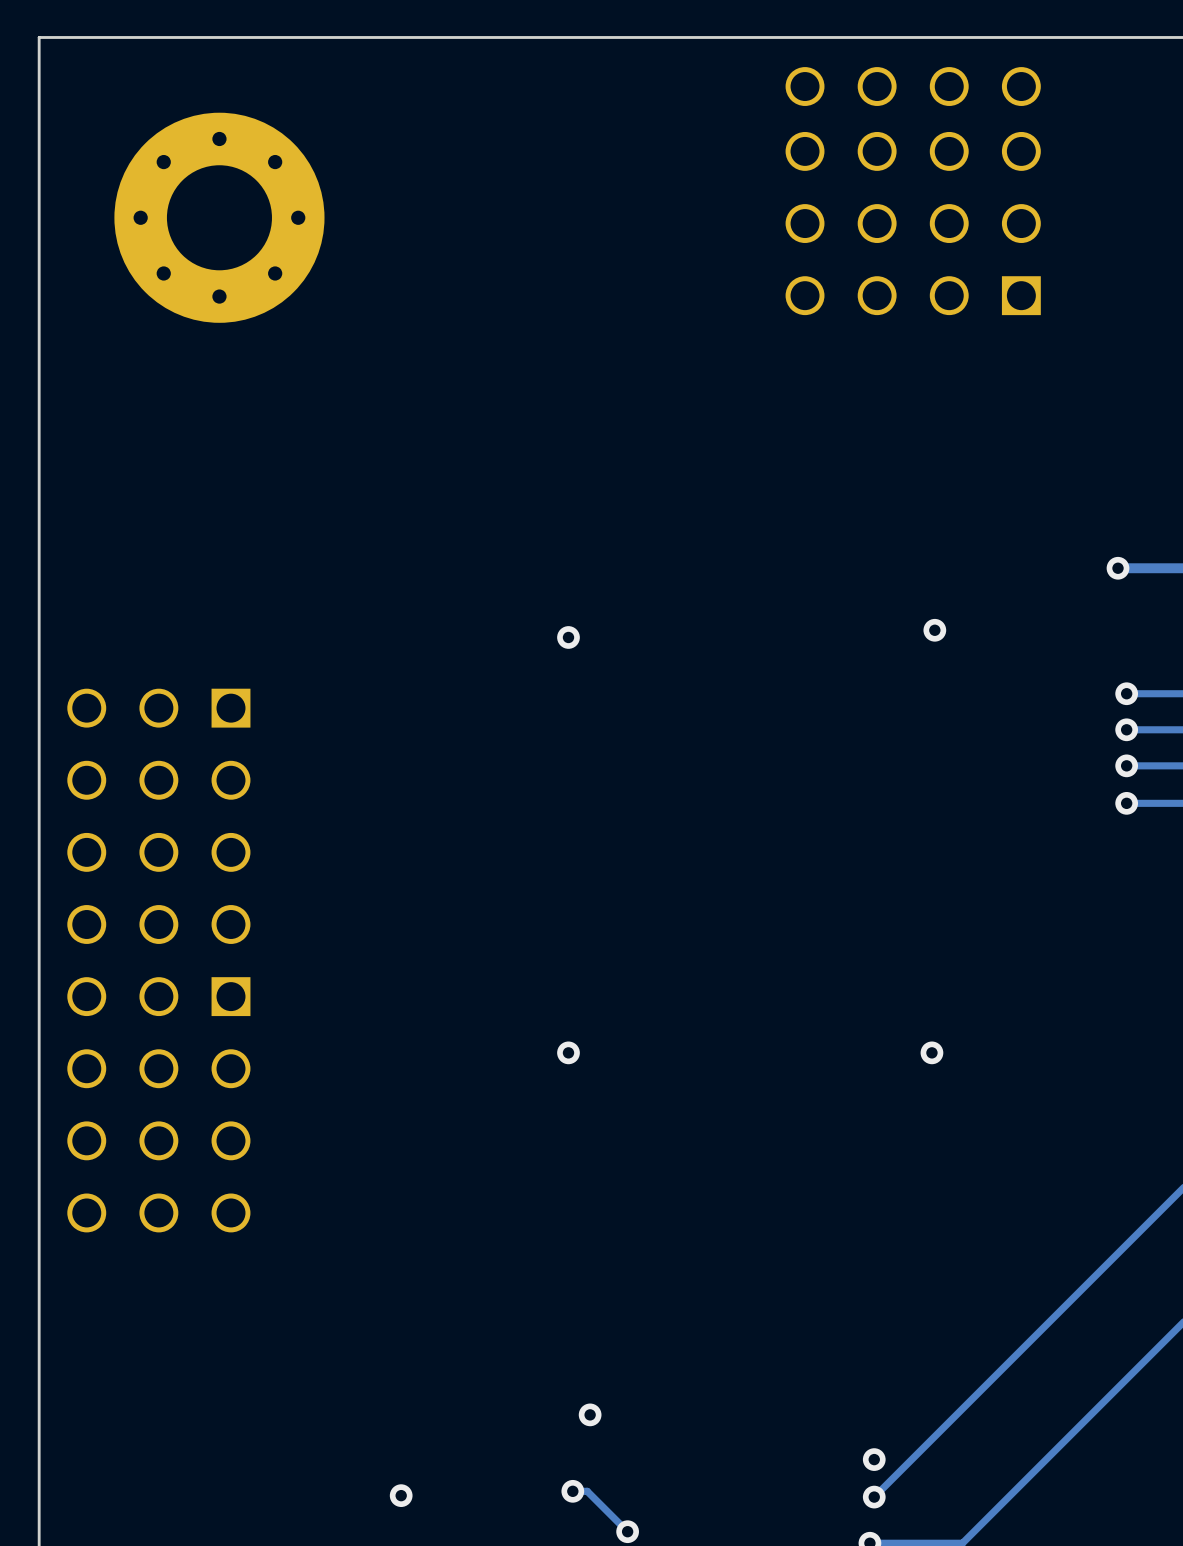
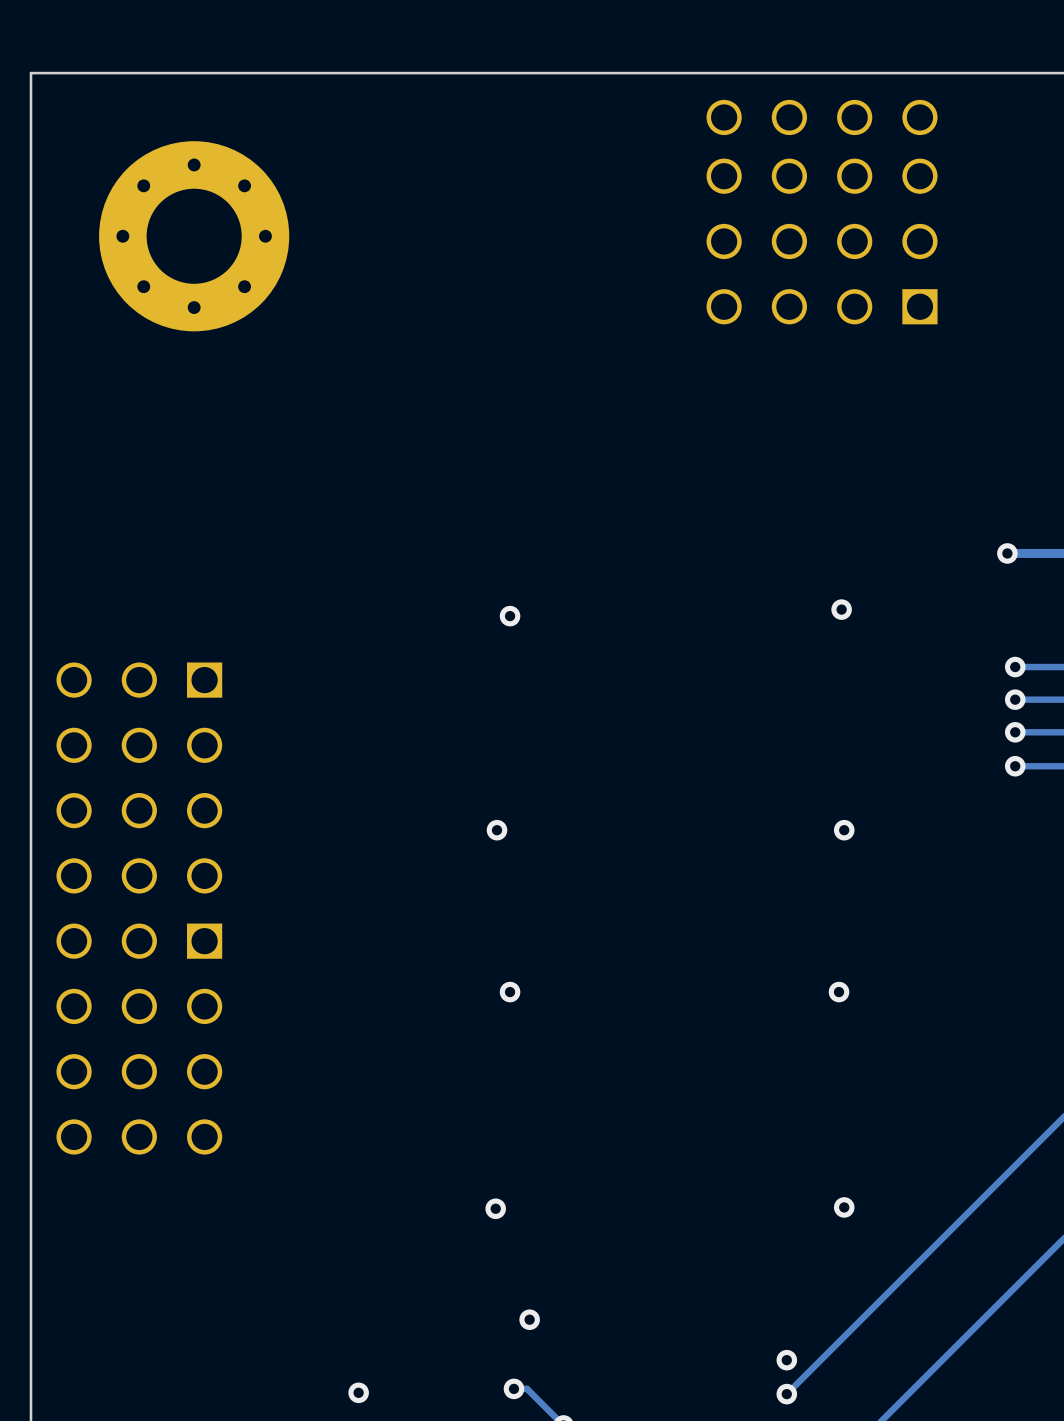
via: none -> (497, 830)
via: none -> (844, 830)
via: none -> (844, 1207)
via: none -> (495, 1208)

